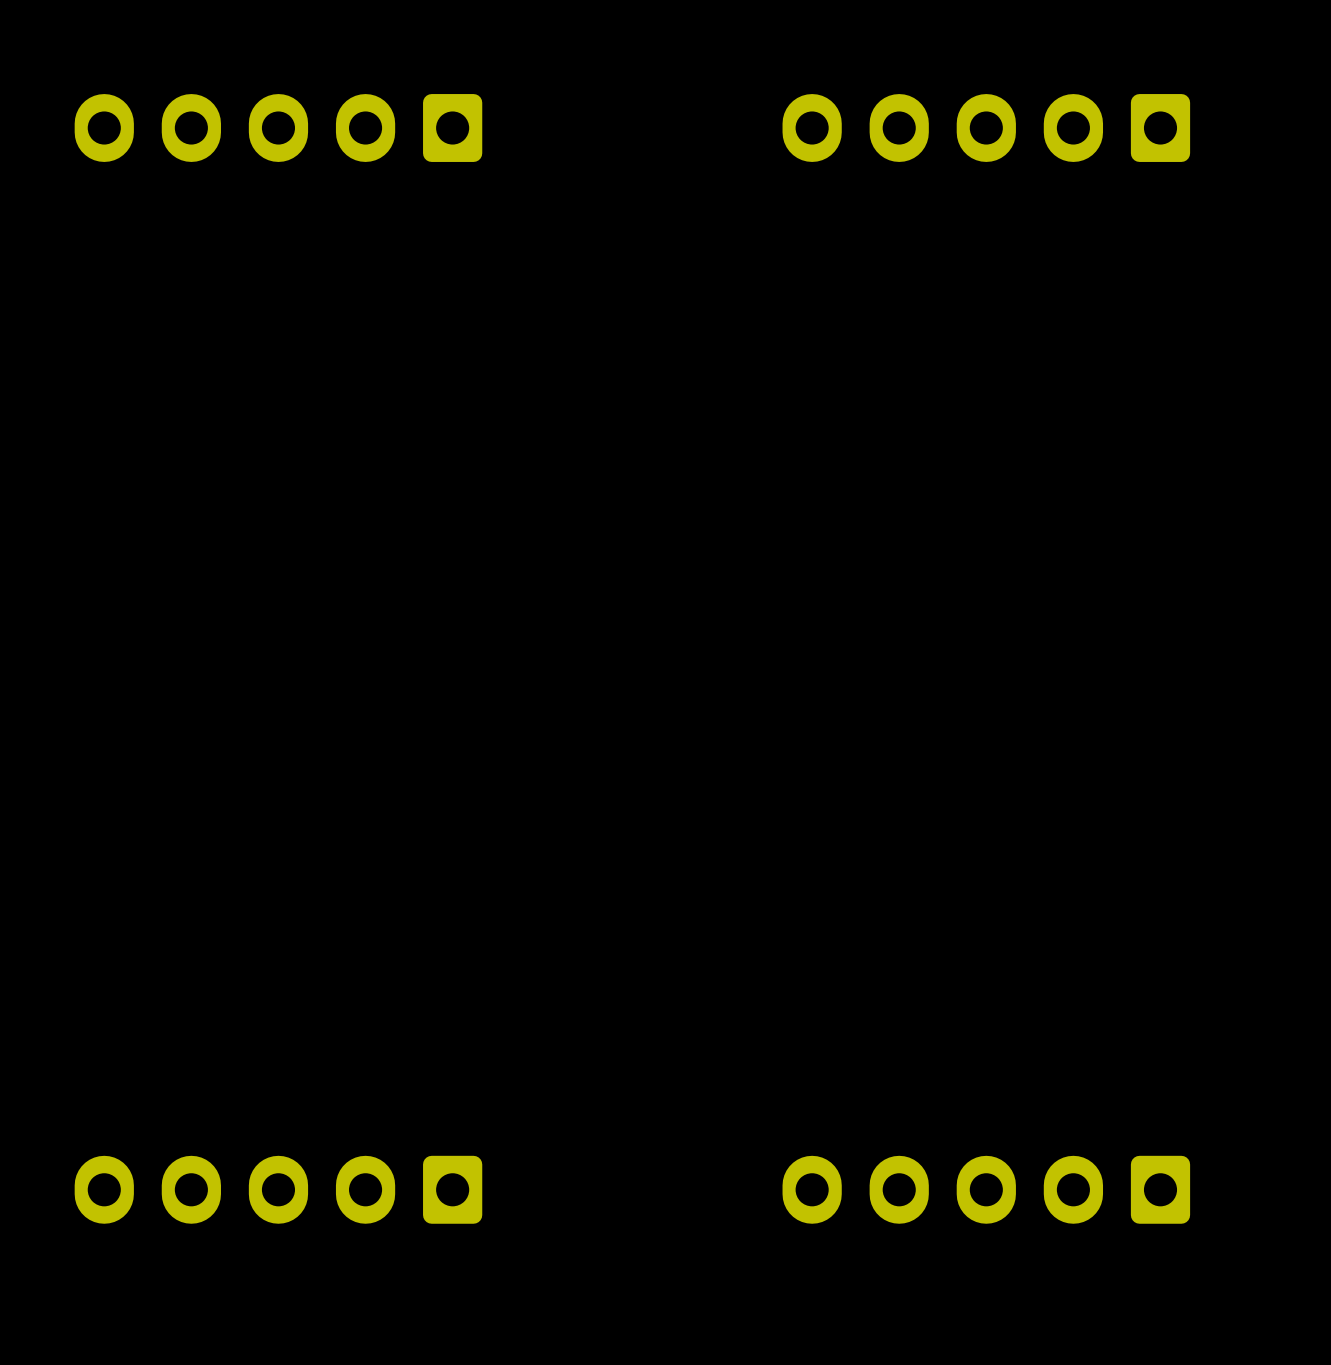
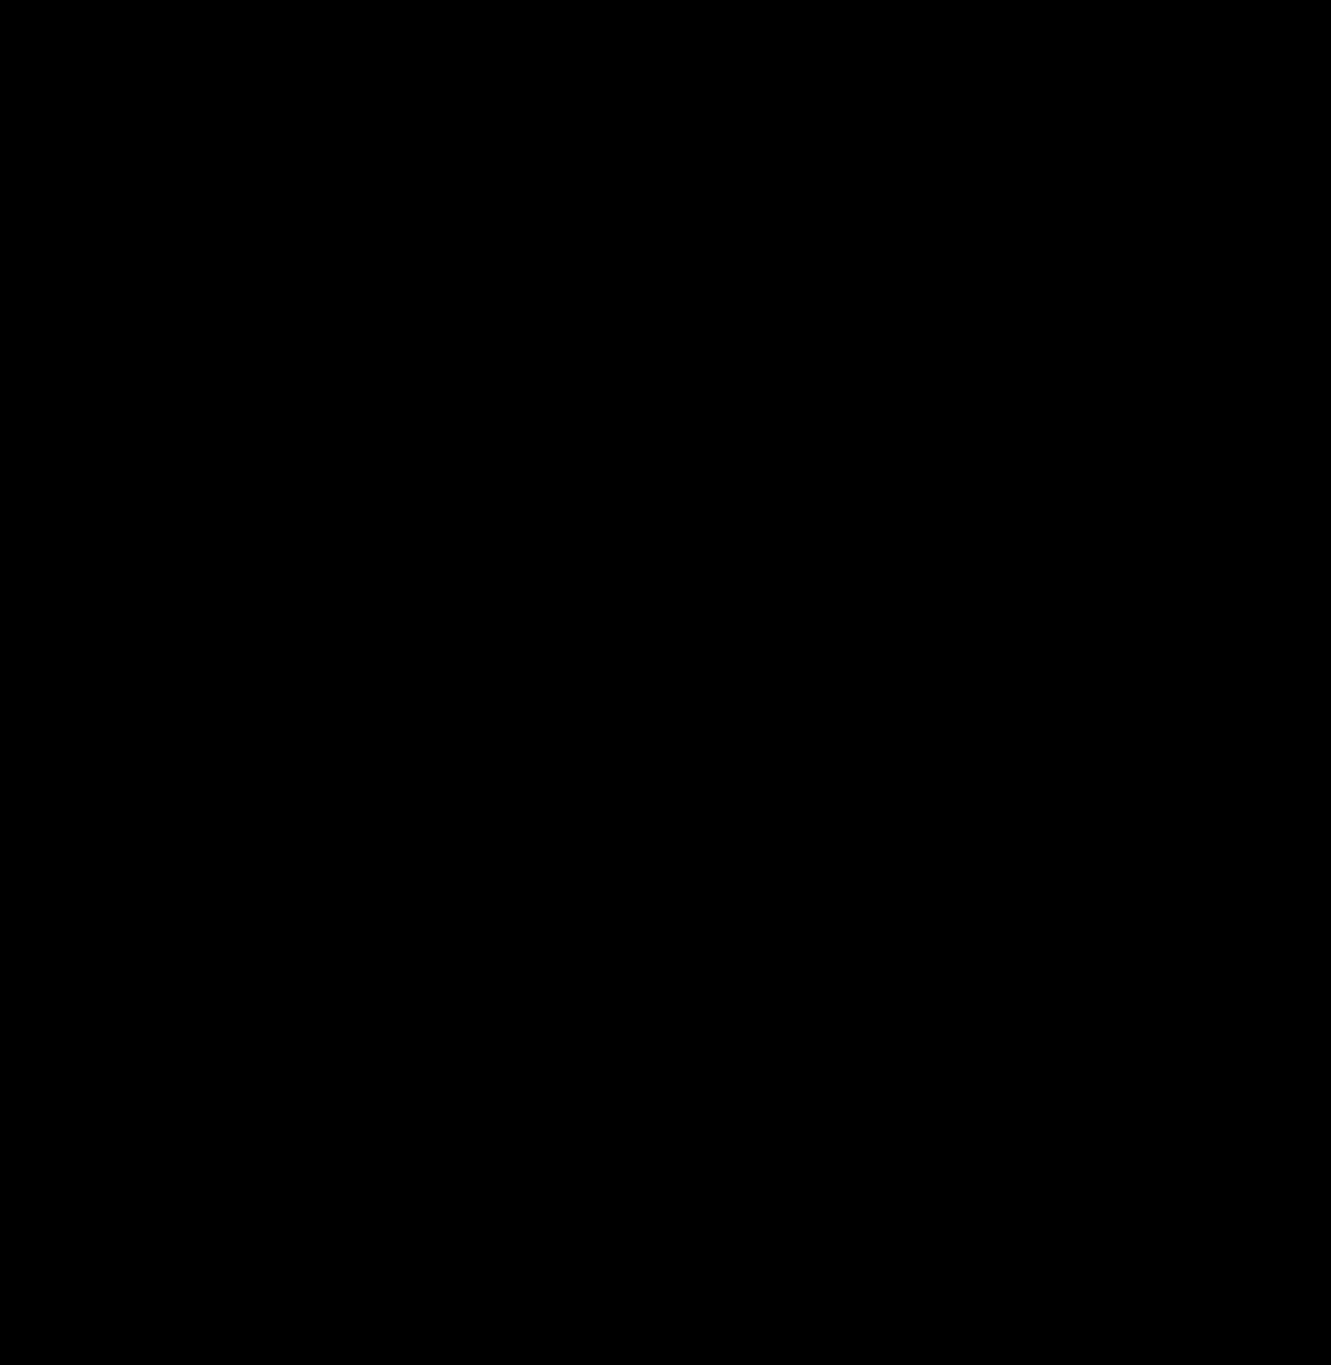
part: (278, 128) -> none
part: (986, 128) -> none
part: (278, 1189) -> none
part: (986, 1189) -> none

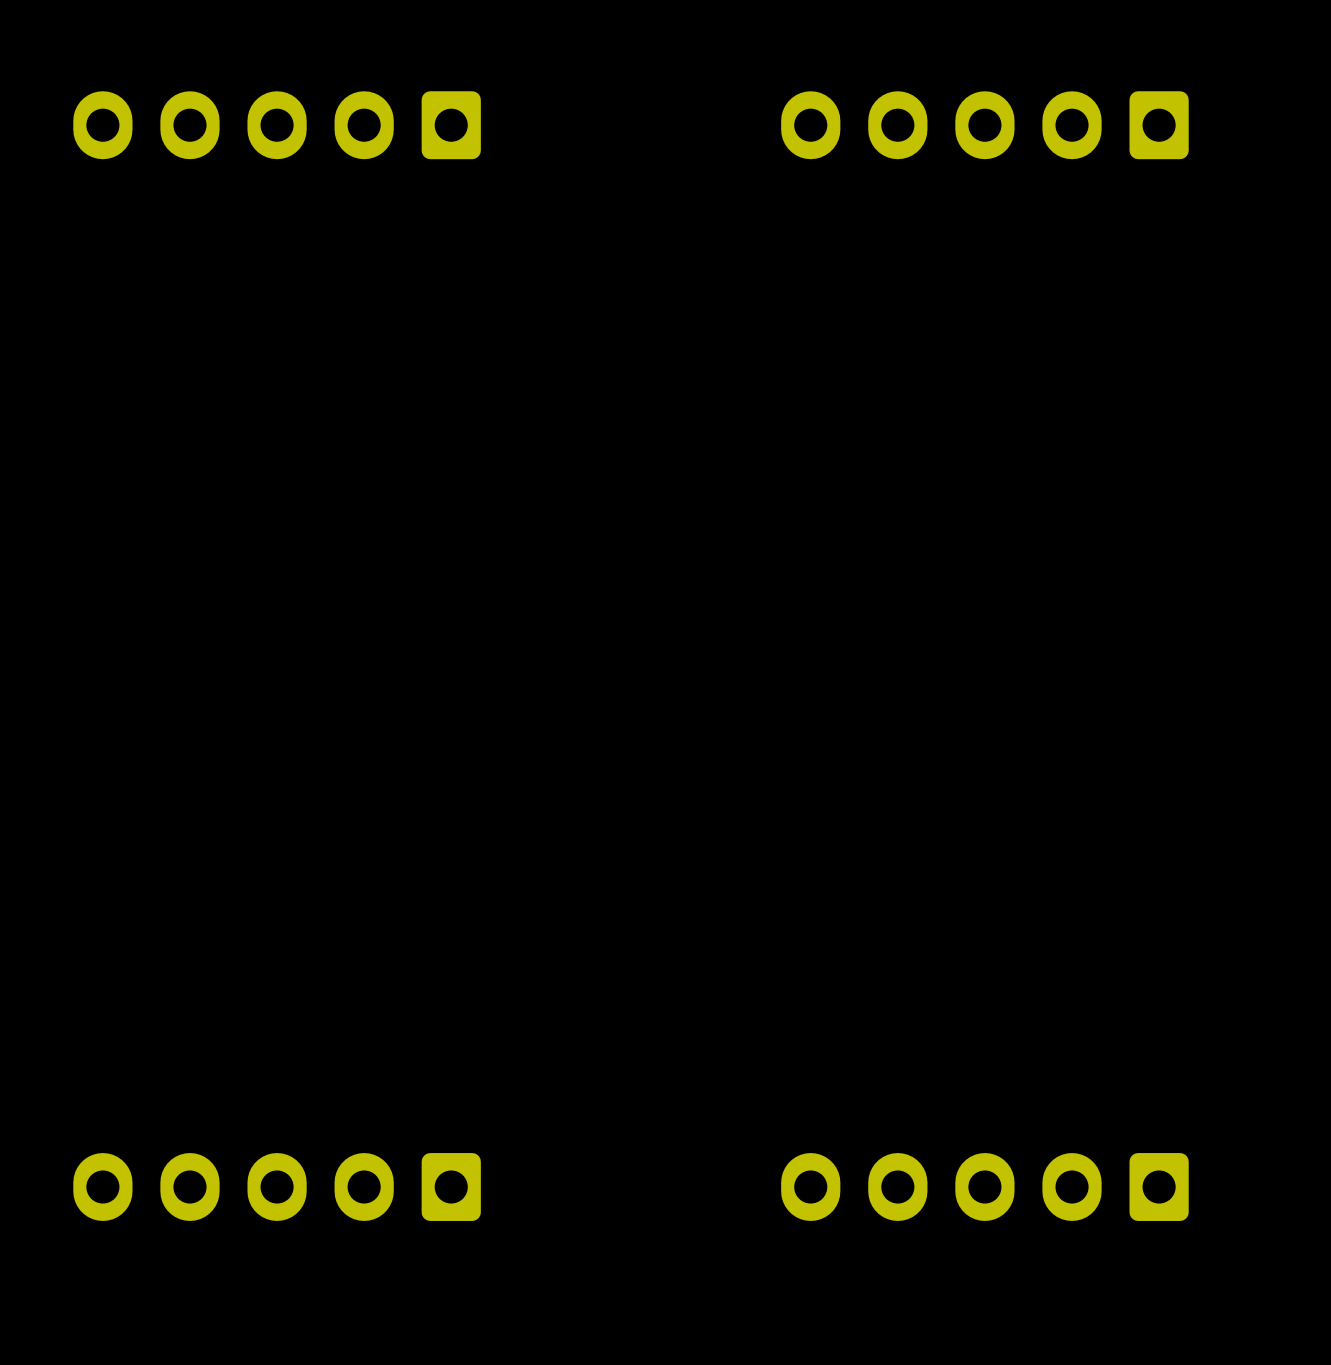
part: none -> (277, 125)
part: none -> (984, 125)
part: none -> (277, 1187)
part: none -> (984, 1187)

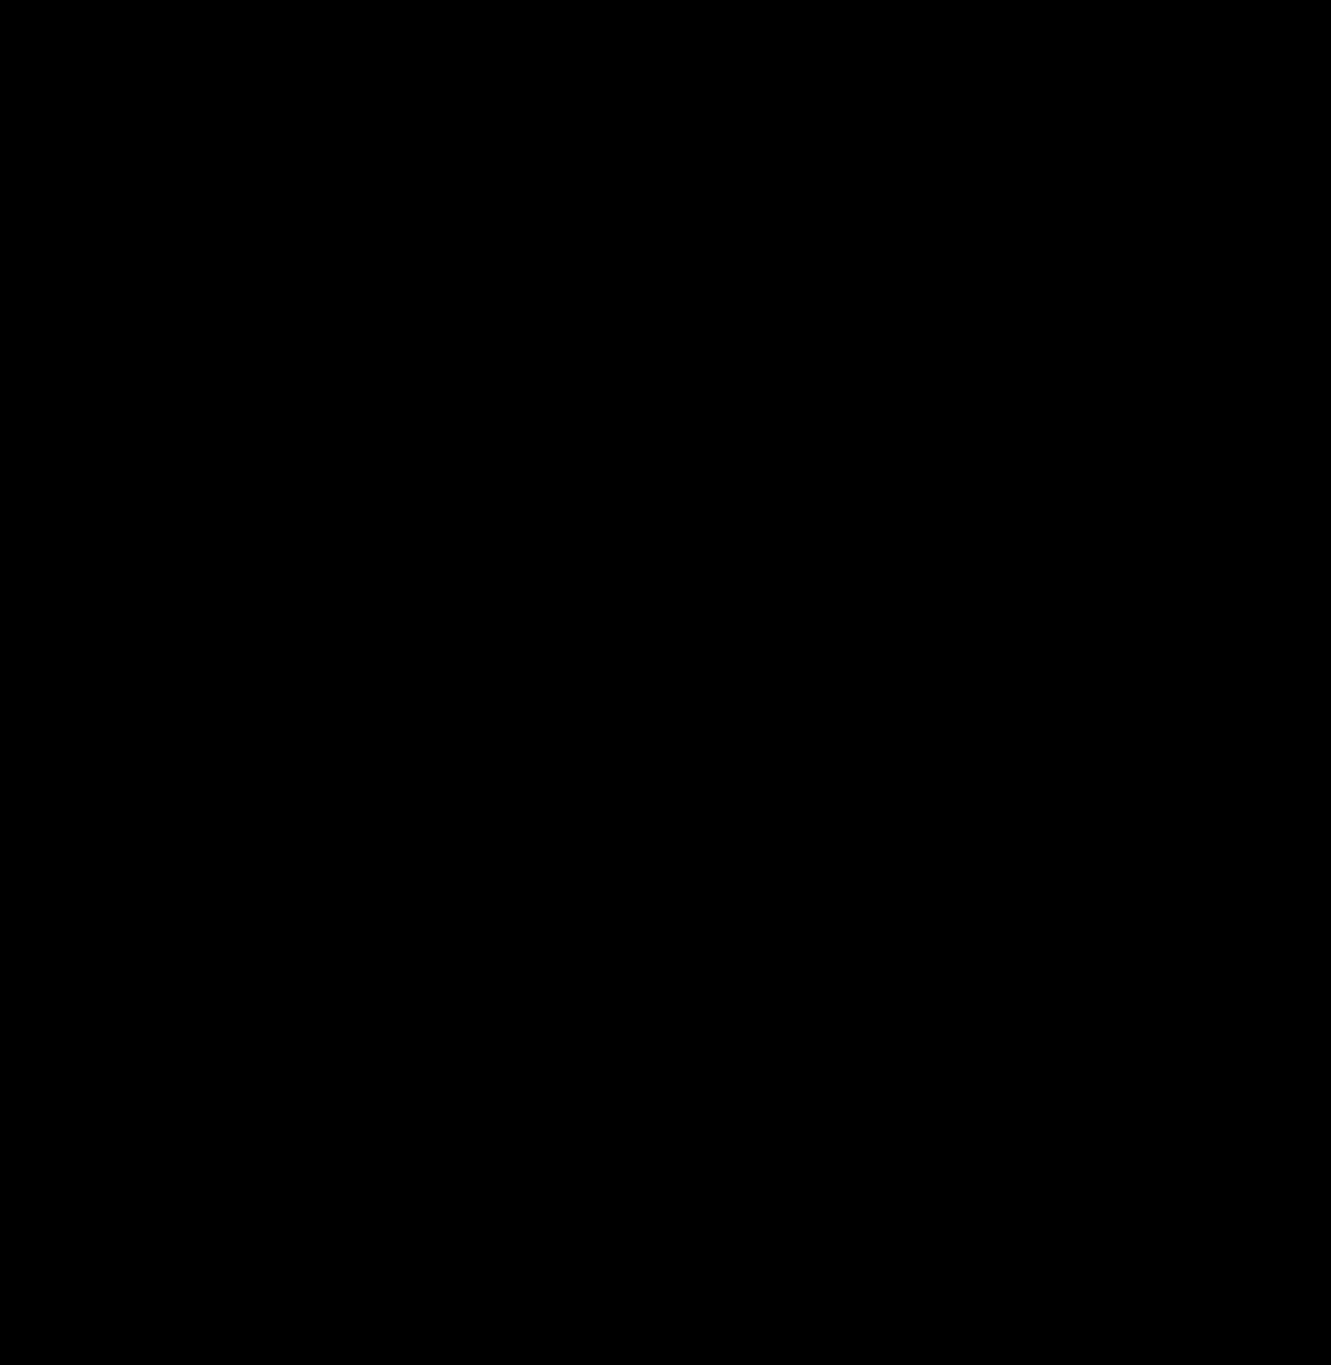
part: (277, 125) -> none
part: (984, 125) -> none
part: (277, 1187) -> none
part: (984, 1187) -> none

